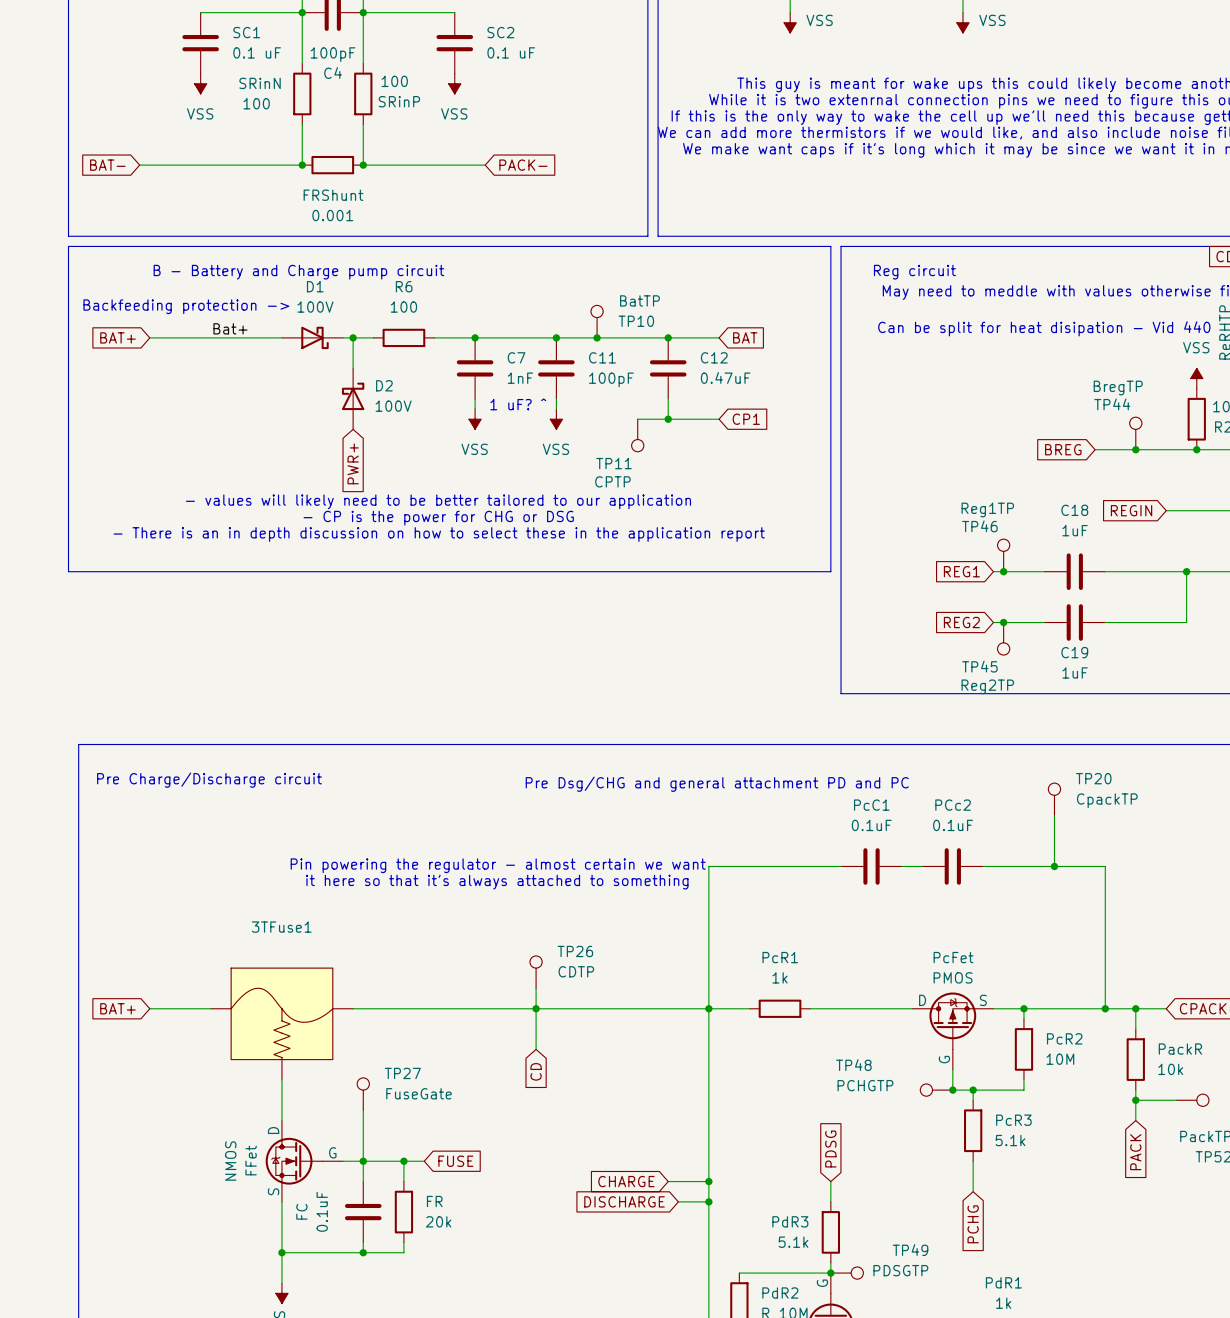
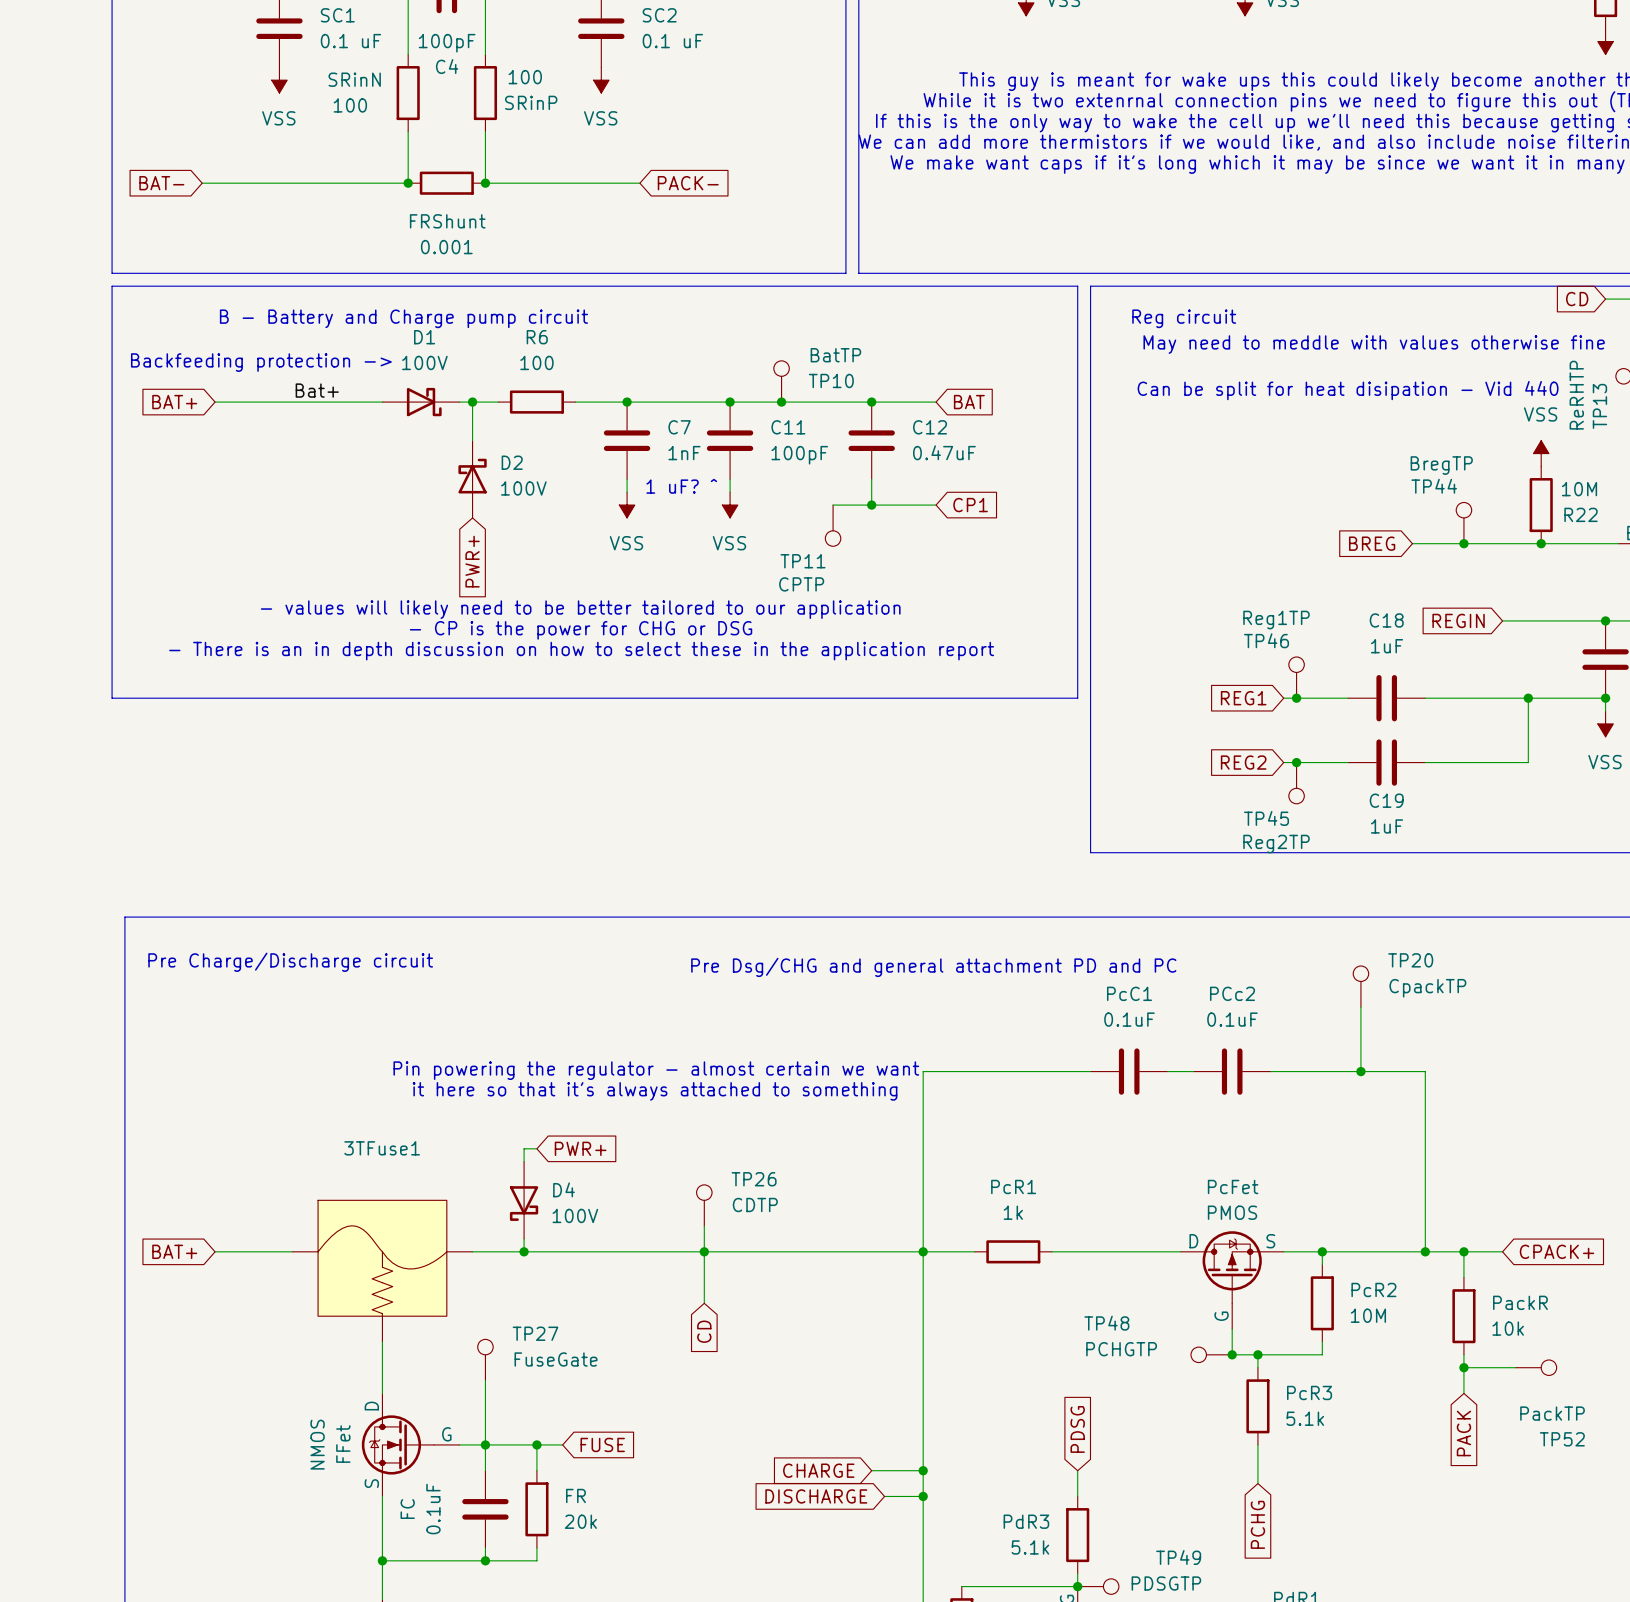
wire: none -> (536, 1148) (524, 1148) (524, 1161)
global label: none -> PWR+ (580, 1148)
D4: none -> 100V (524, 1200)
wire: none -> (524, 1238) (524, 1251)
junction: none -> (524, 1251)

